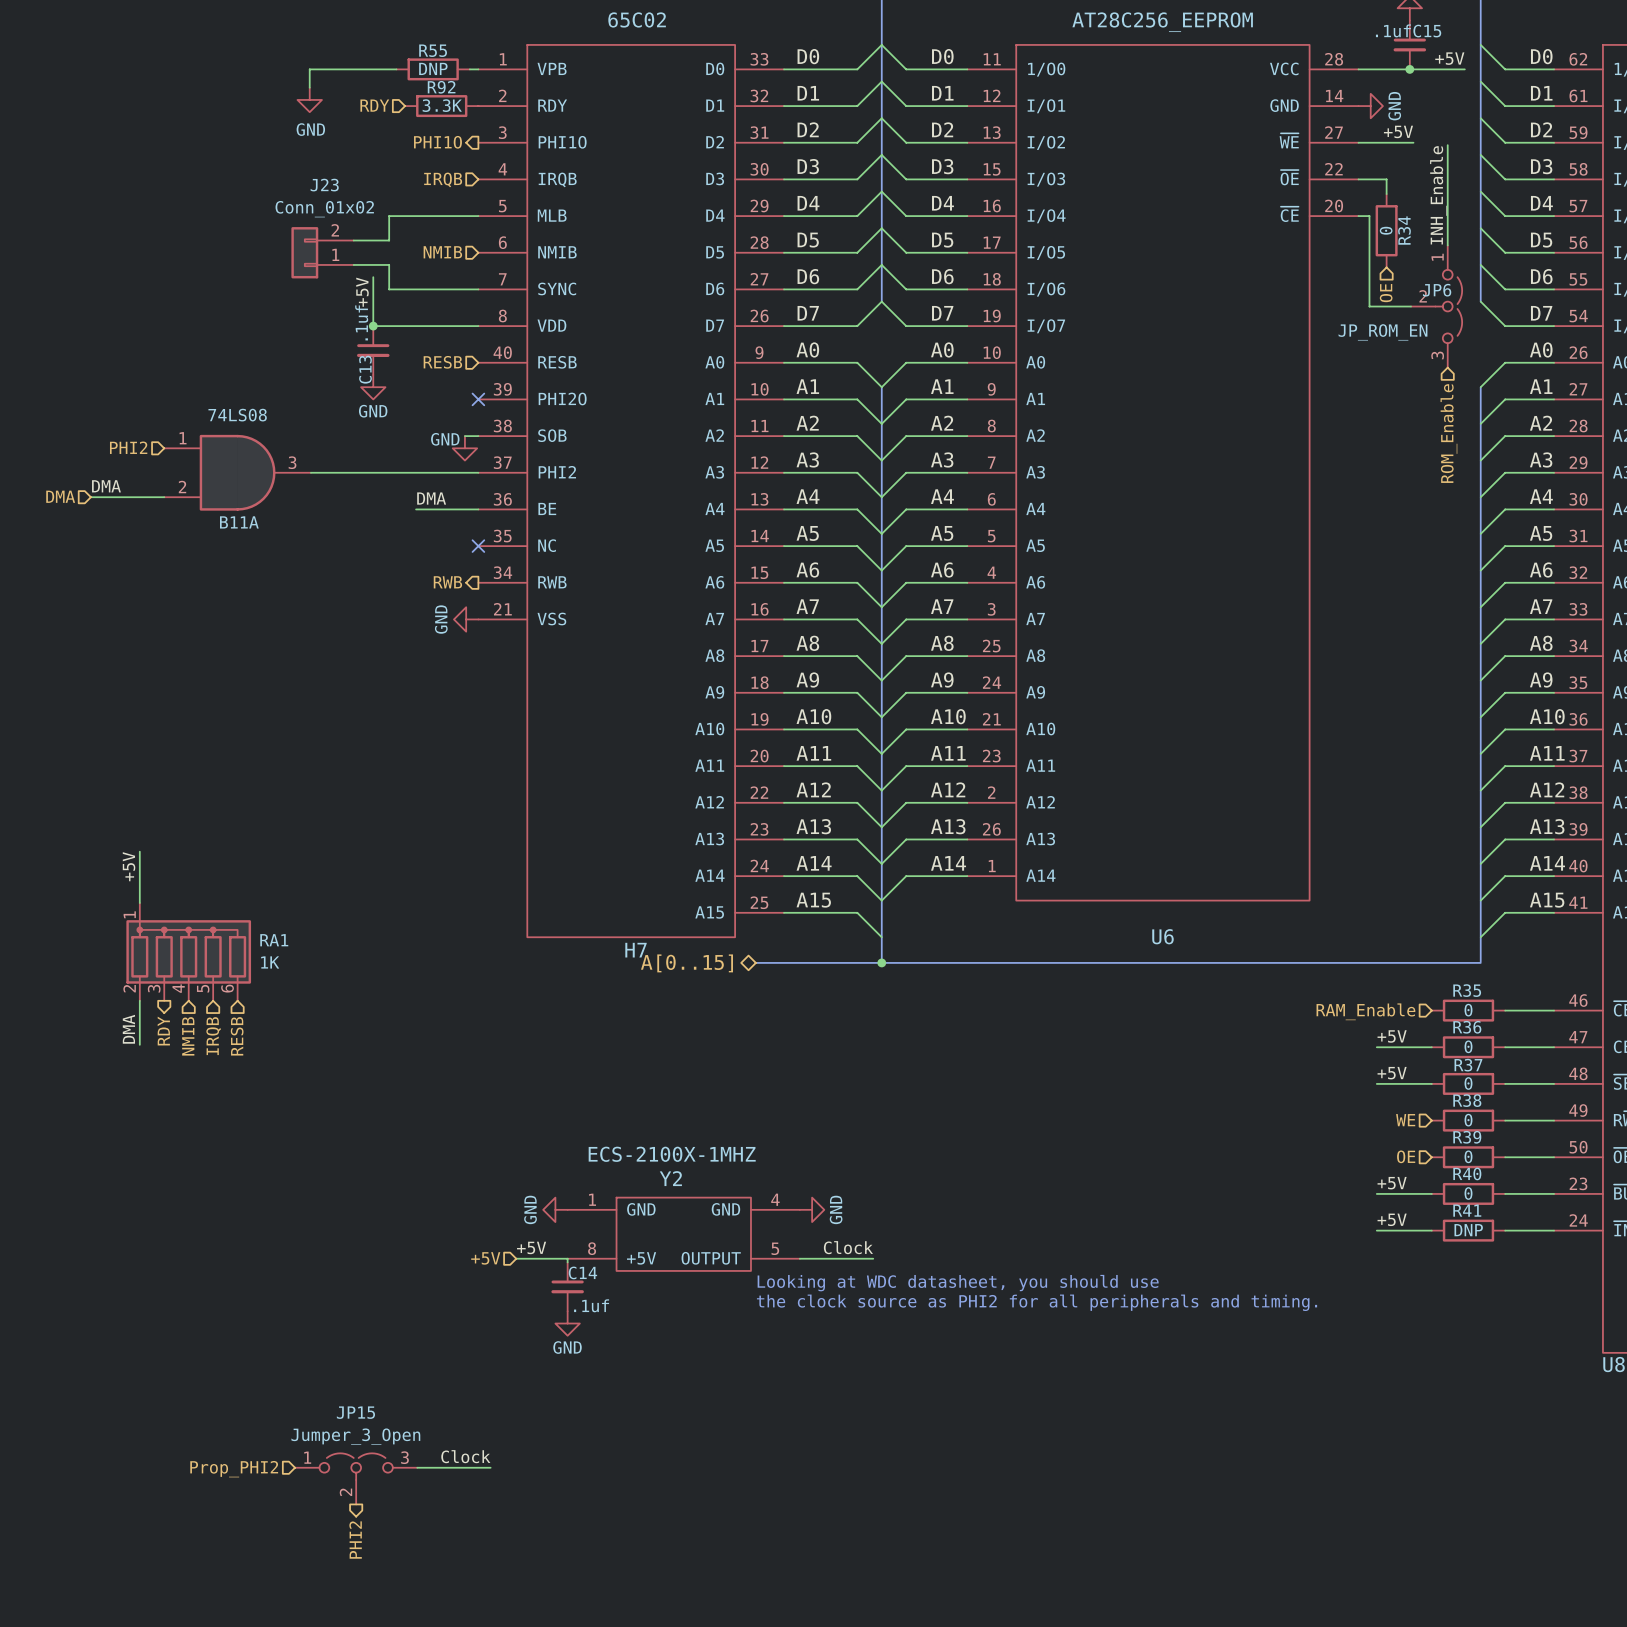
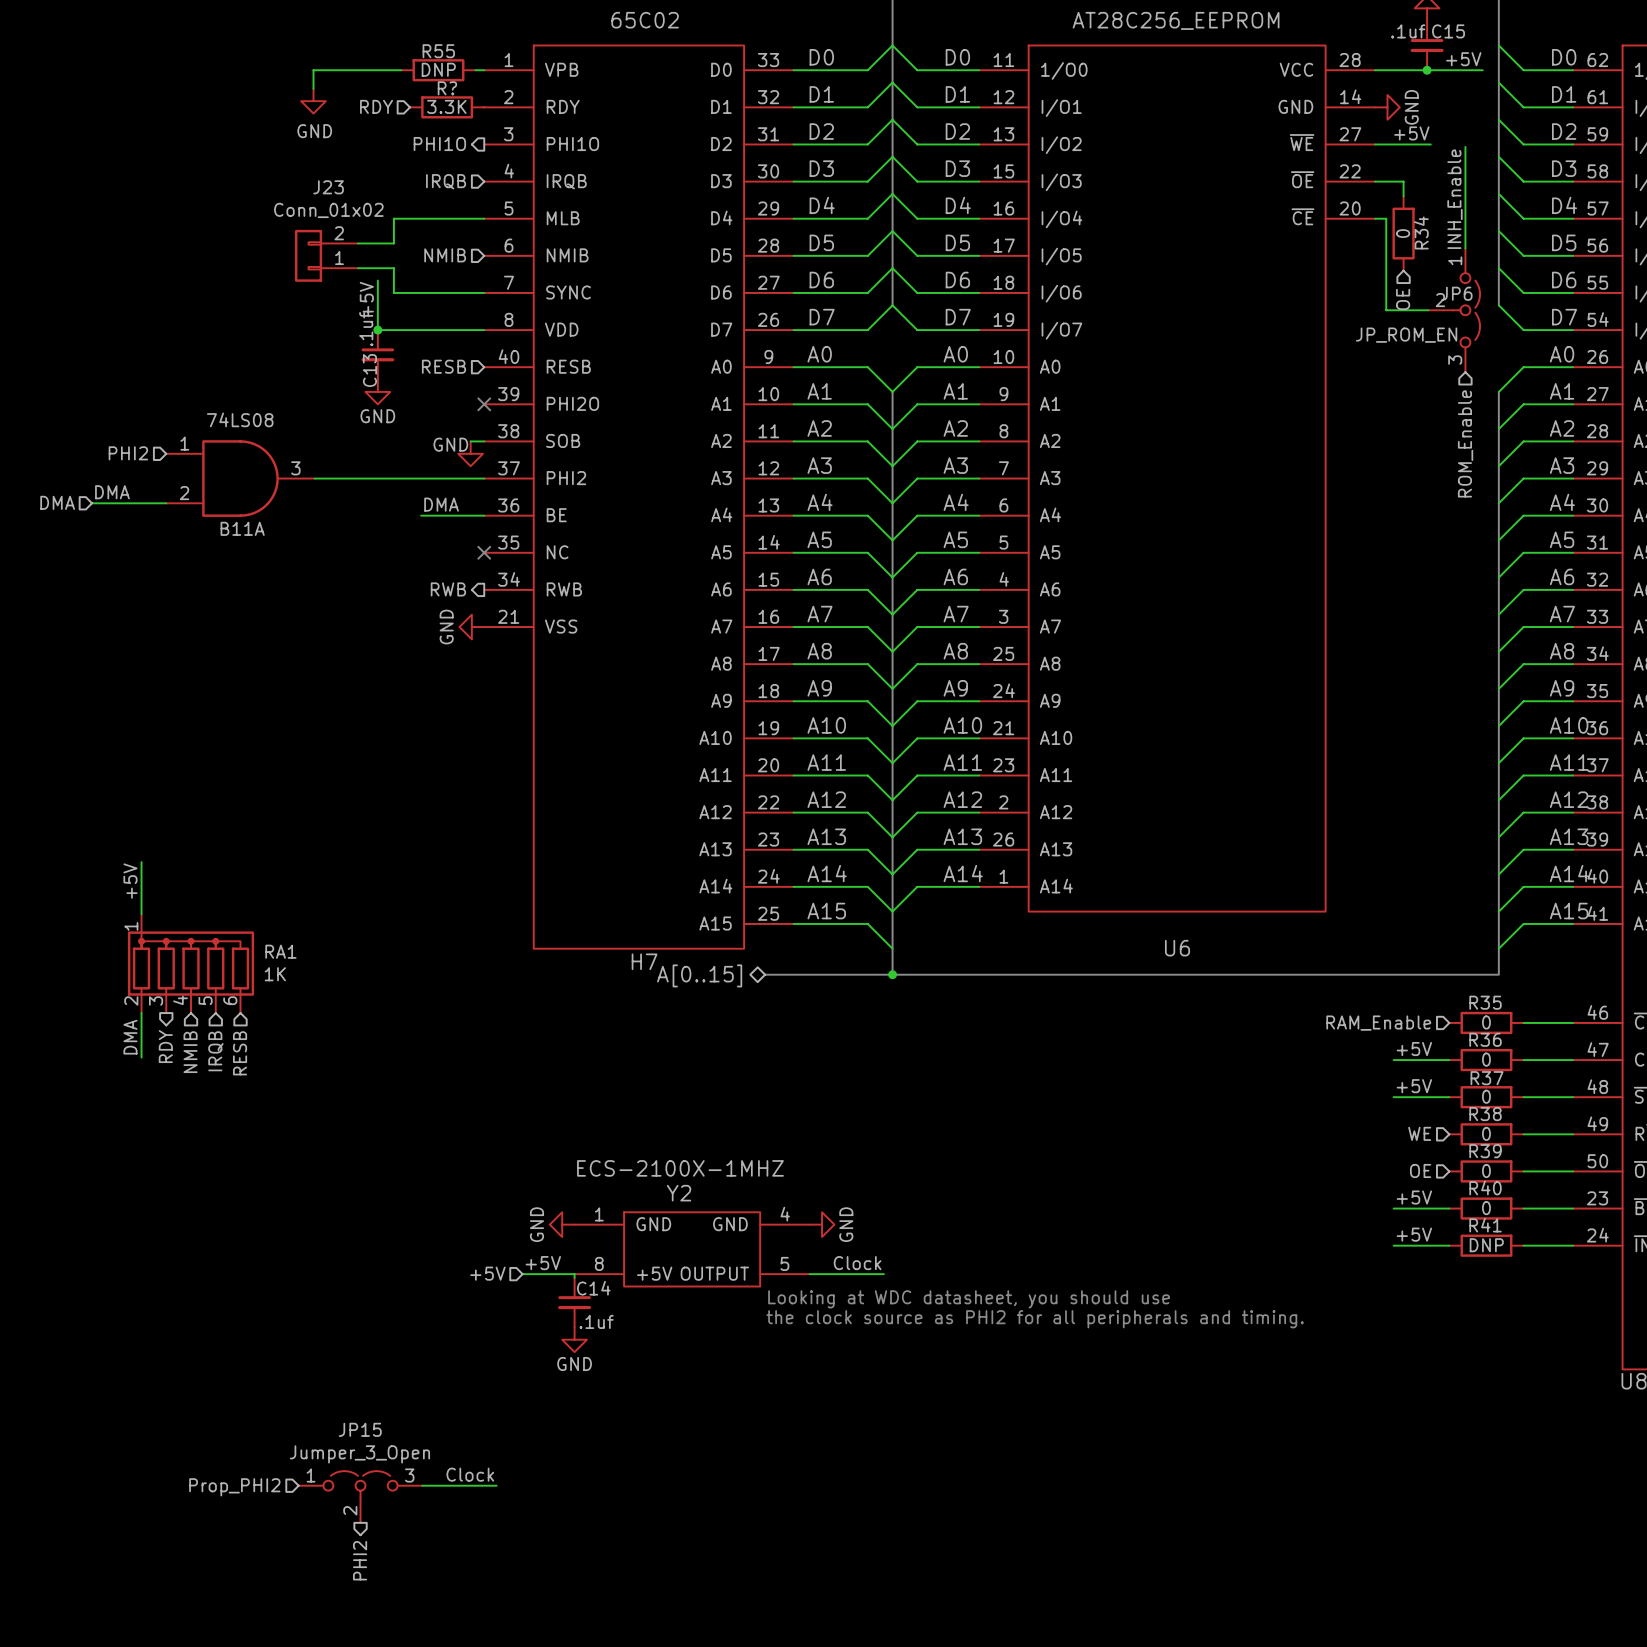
R92 name: R92 (441, 87) -> R? (447, 88)

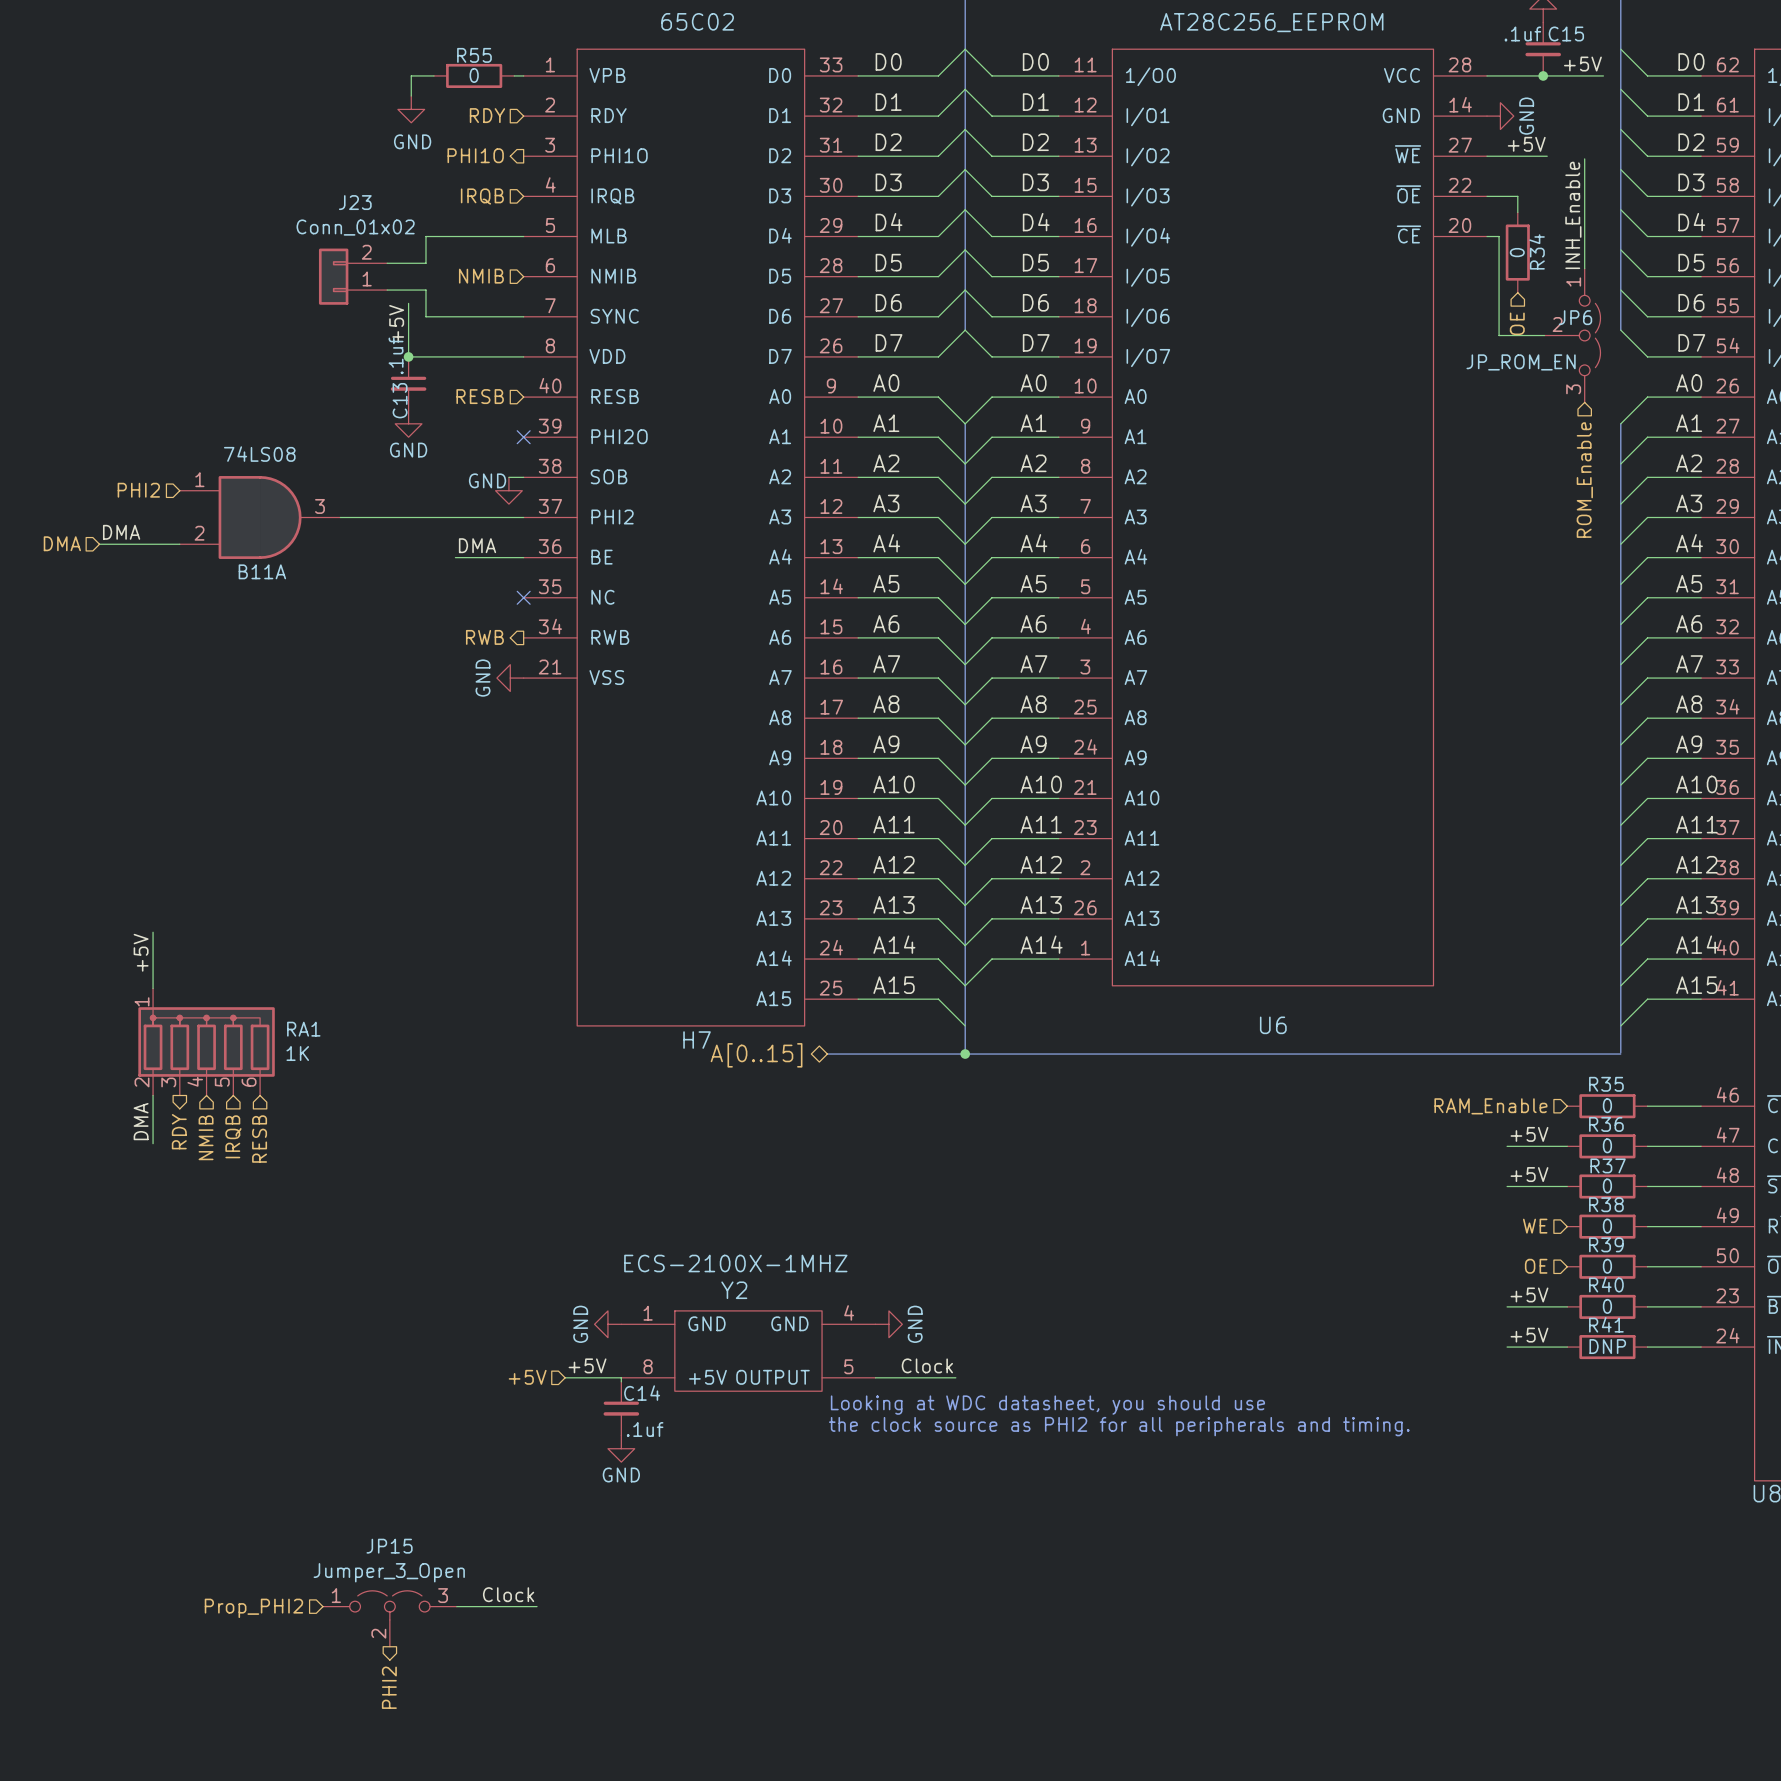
R55 value: DNP (438, 69) -> 0 (474, 75)
wire: (380, 70) (313, 70) (313, 88) -> (411, 75) (411, 96)
power symbol position: GND (313, 101) -> GND (411, 109)
hierarchical label position: RDY (376, 106) -> RDY (487, 115)
R?: 3.3K (447, 107) -> none

